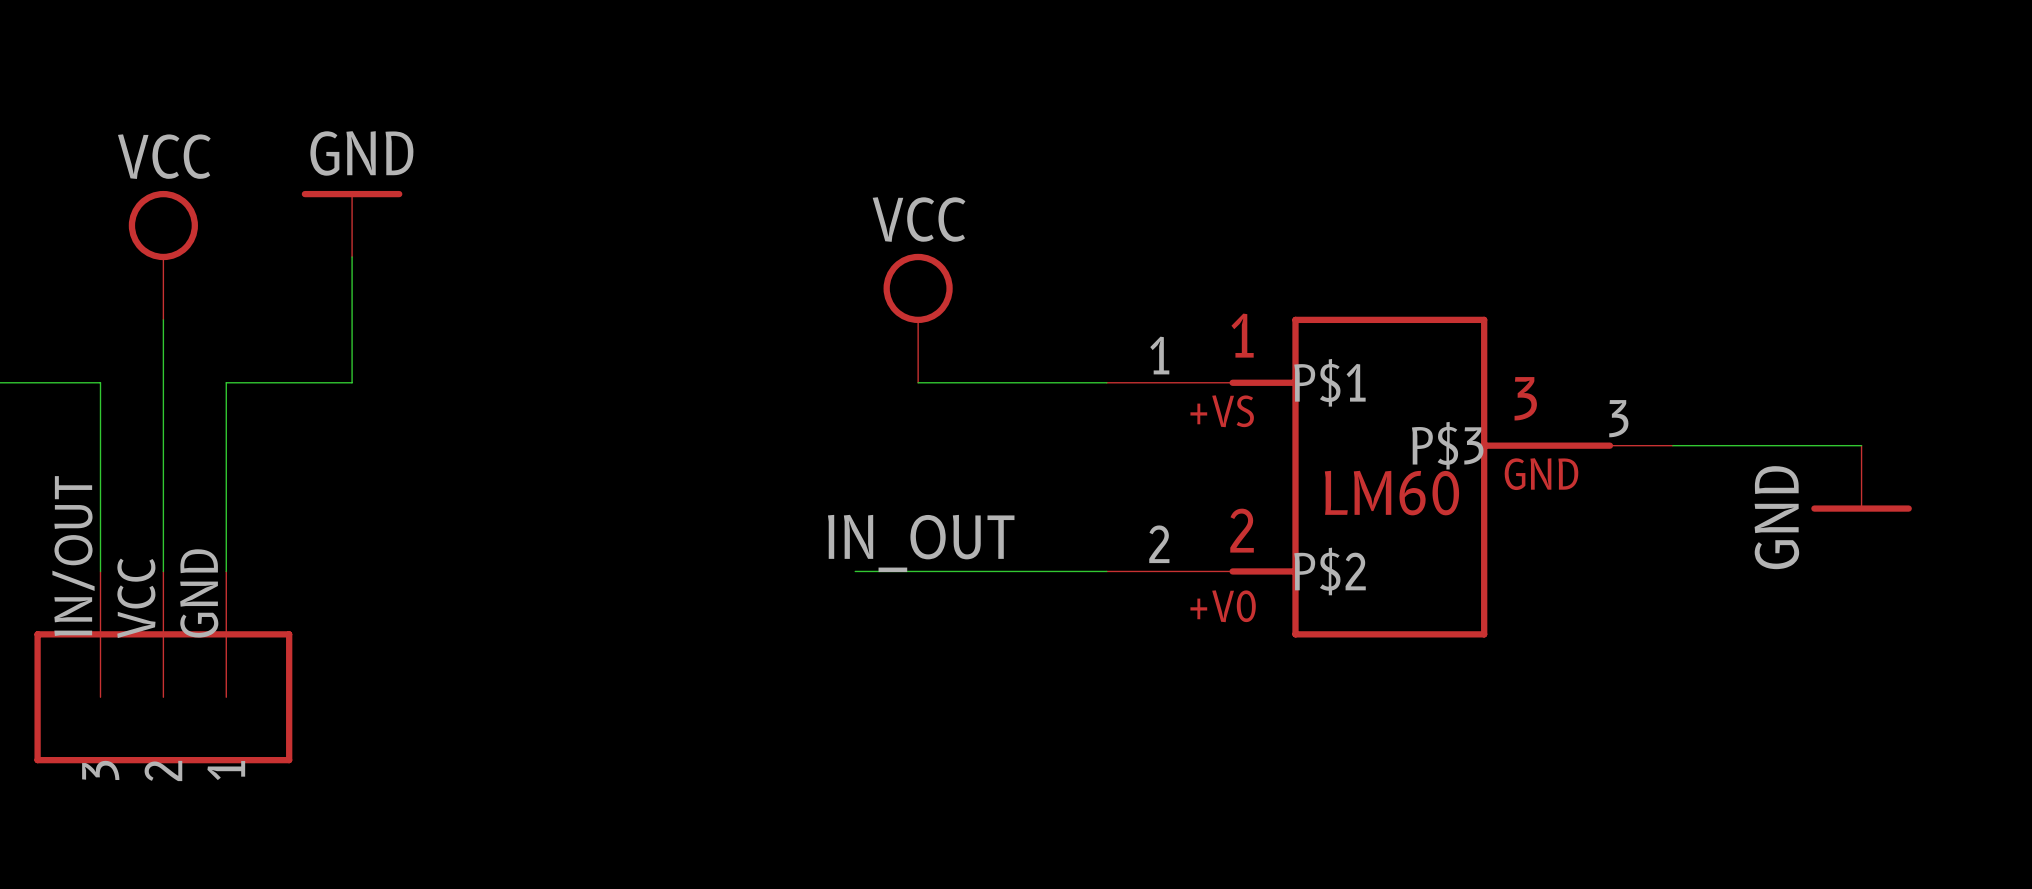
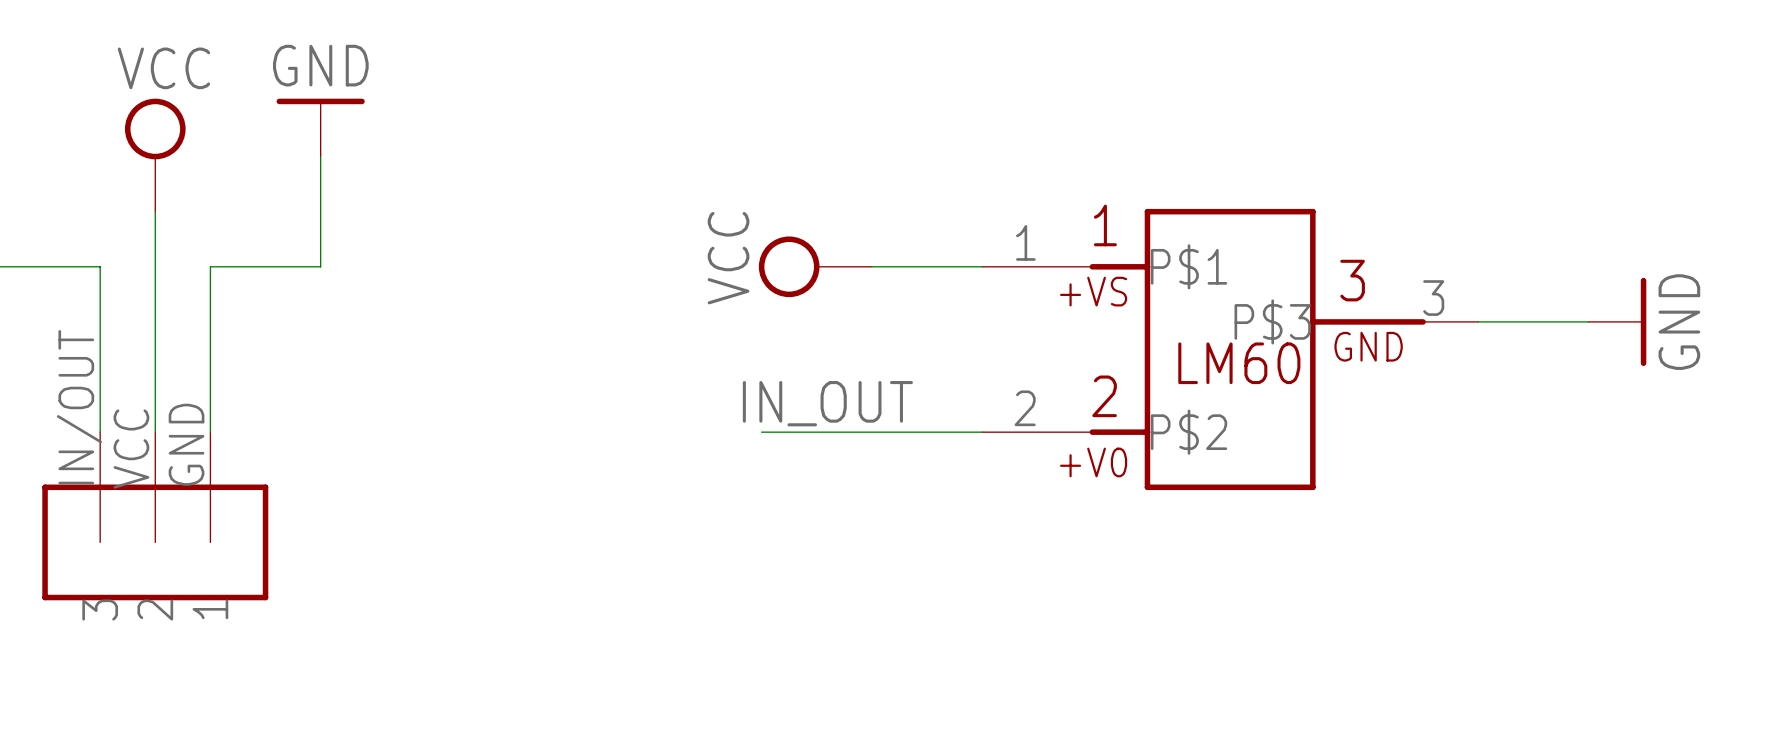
power symbol rotation: 0° (918, 288) -> 90° counterclockwise (789, 266)
power symbol rotation: 0° (1861, 508) -> 90° counterclockwise (1643, 321)
power symbol text position: GND (1776, 517) -> GND (1679, 322)

